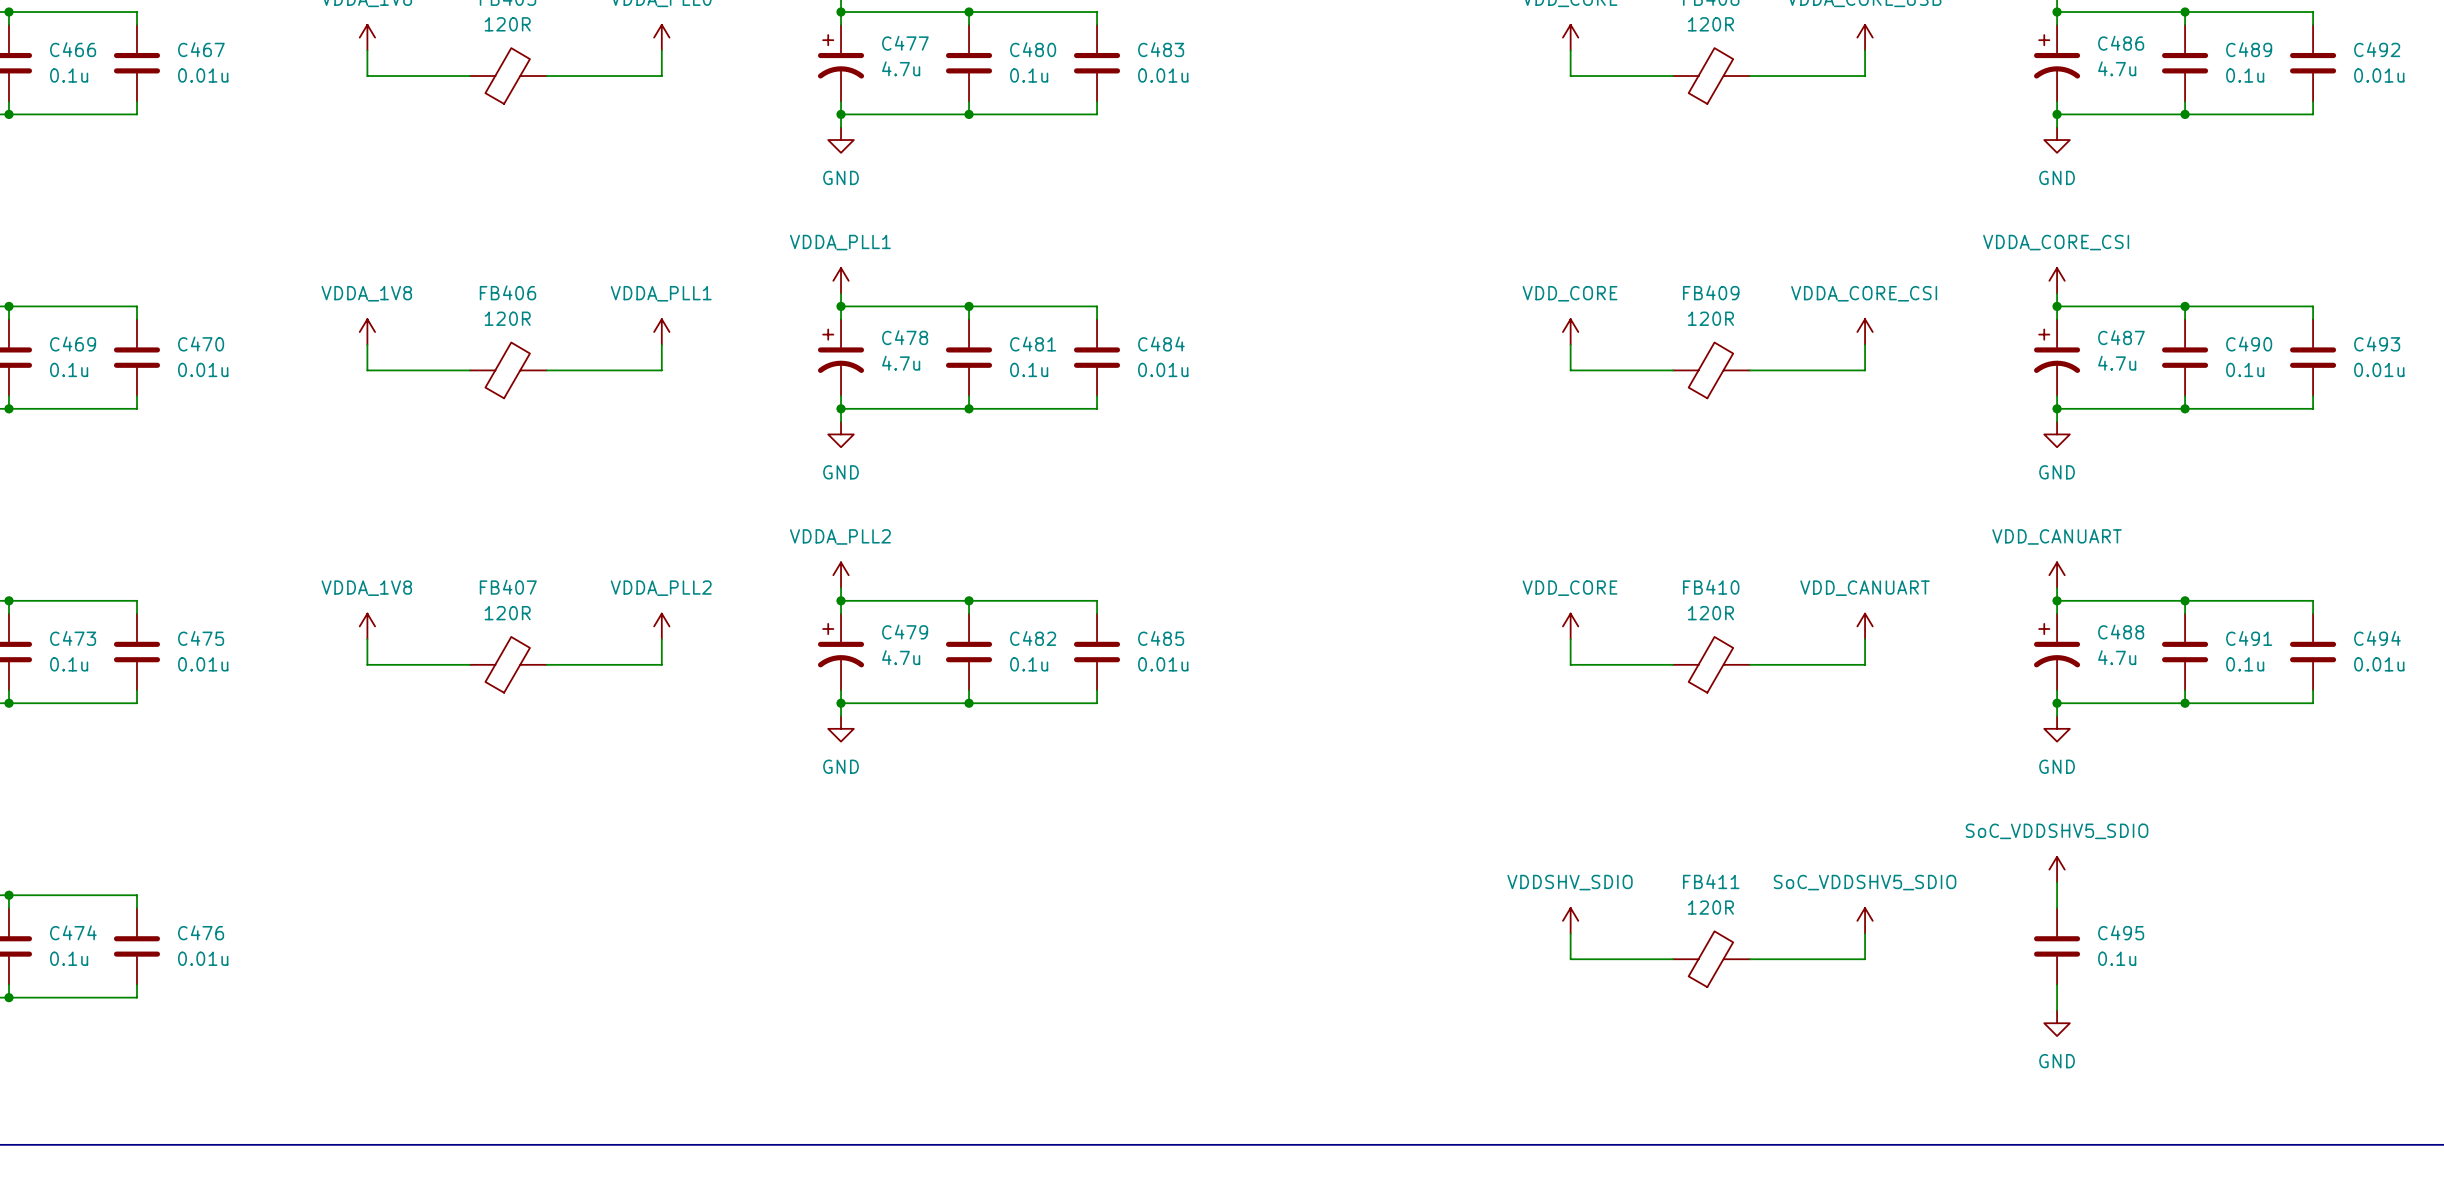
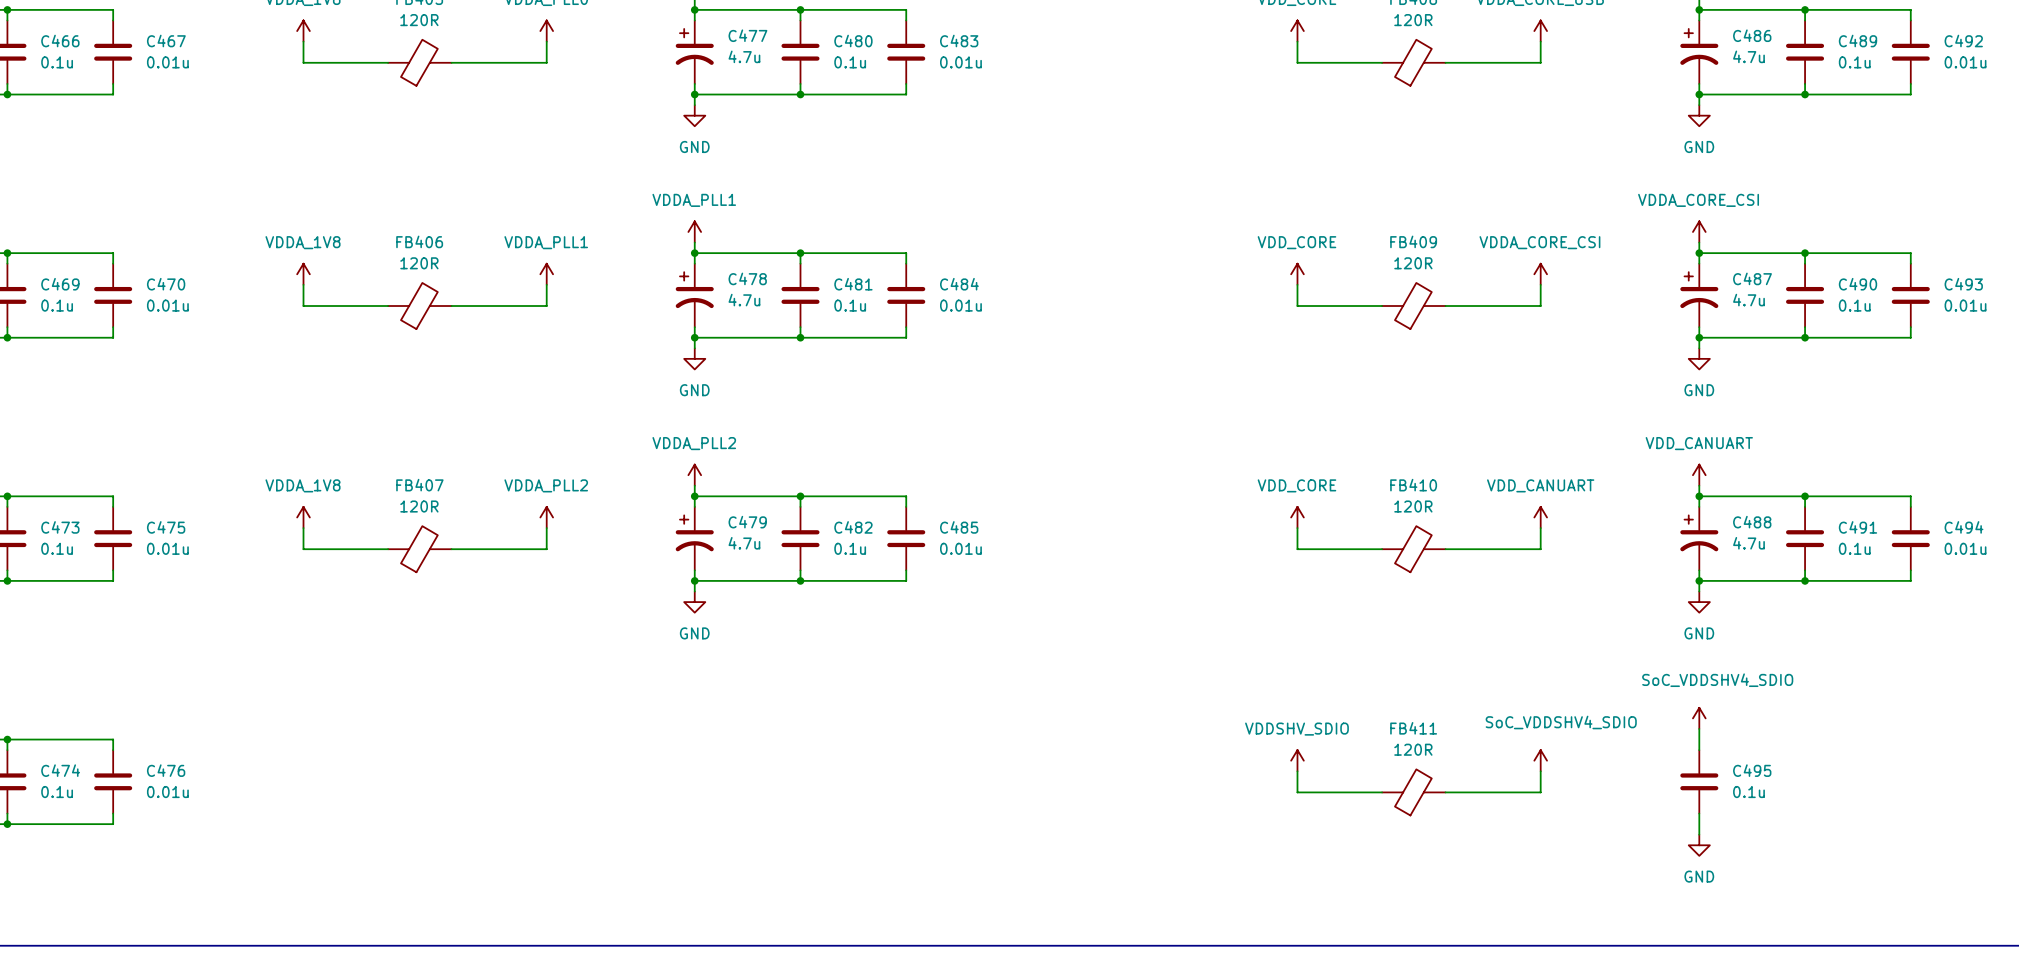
power symbol: SoC_VDDSHV5_SDIO (2057, 869) -> SoC_VDDSHV4_SDIO (1699, 718)
power symbol: SoC_VDDSHV5_SDIO (1865, 920) -> SoC_VDDSHV4_SDIO (1540, 760)

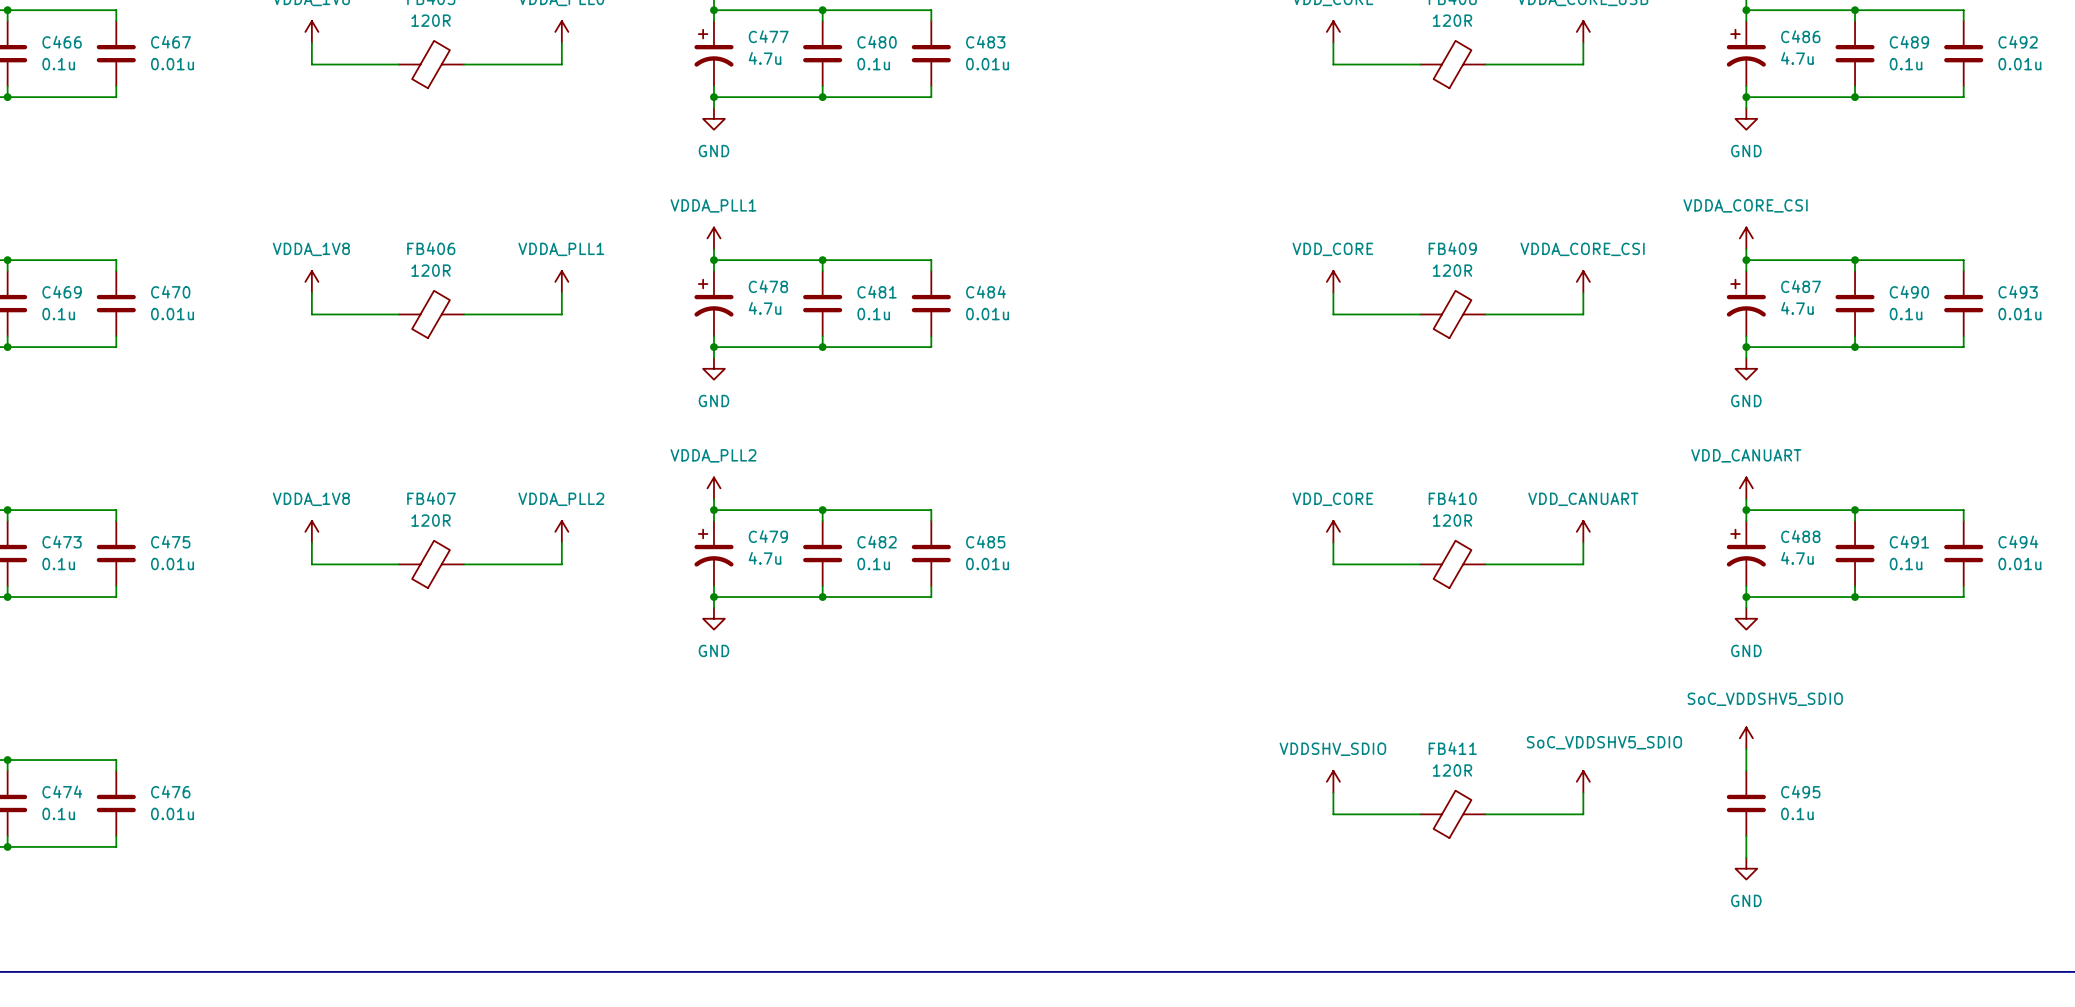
power symbol: SoC_VDDSHV4_SDIO (1699, 718) -> SoC_VDDSHV5_SDIO (1746, 738)
power symbol: SoC_VDDSHV4_SDIO (1540, 760) -> SoC_VDDSHV5_SDIO (1583, 781)

